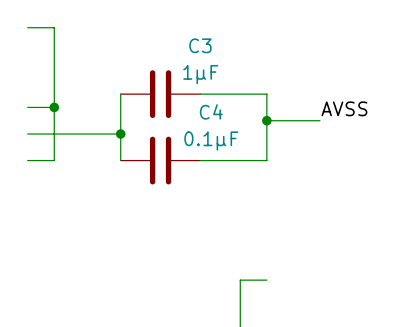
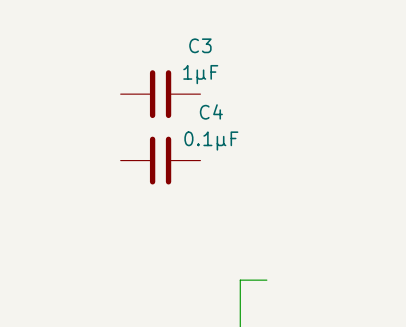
wire: (27, 27) (54, 27) (54, 160) (27, 160) -> none
wire: (120, 94) (120, 160) -> none
wire: (200, 94) (266, 94) (266, 160) (200, 160) -> none
wire: (27, 107) (54, 107) -> none
junction: (54, 107) -> none
label: AVSS (344, 108) -> none
wire: (266, 120) (320, 120) -> none
junction: (266, 120) -> none
wire: (27, 134) (120, 134) -> none
junction: (120, 134) -> none

